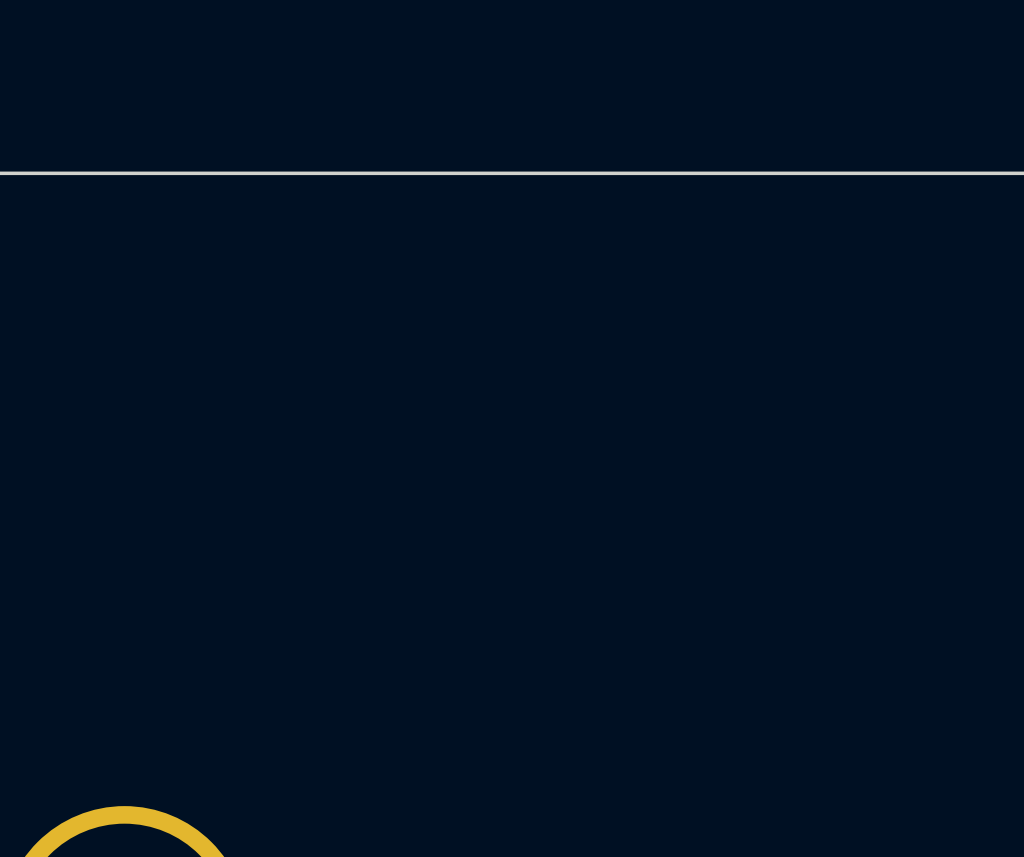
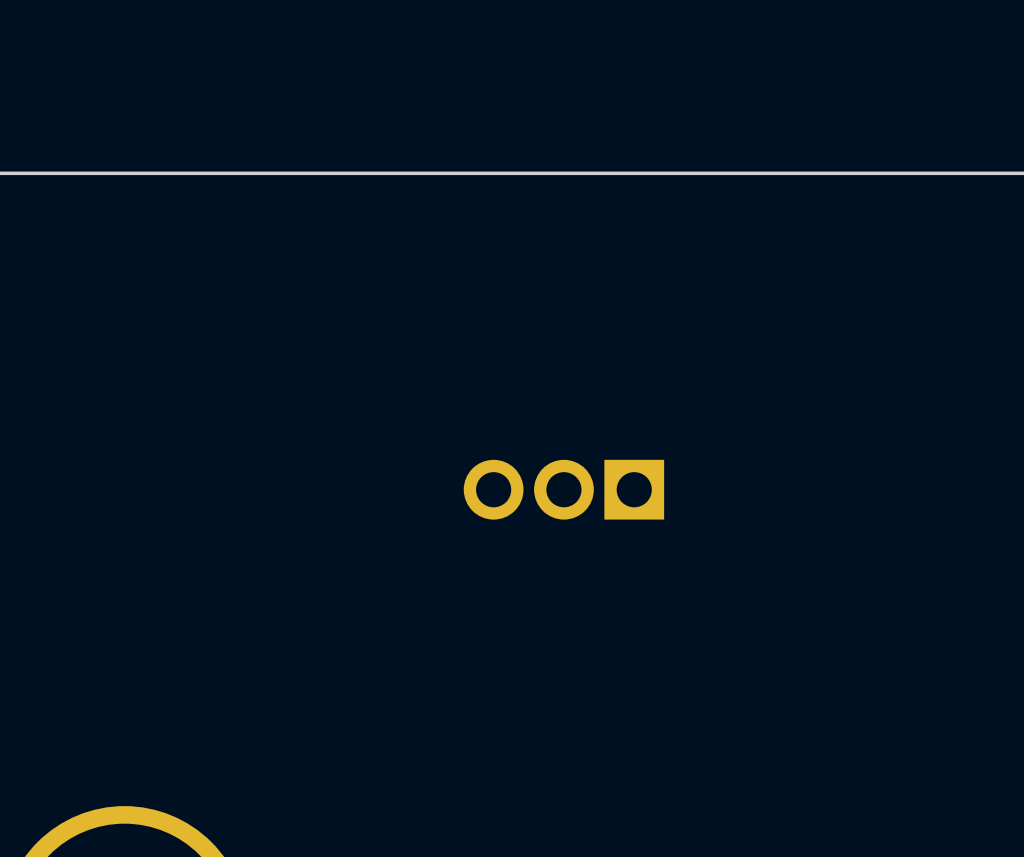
part: none -> (563, 489)

